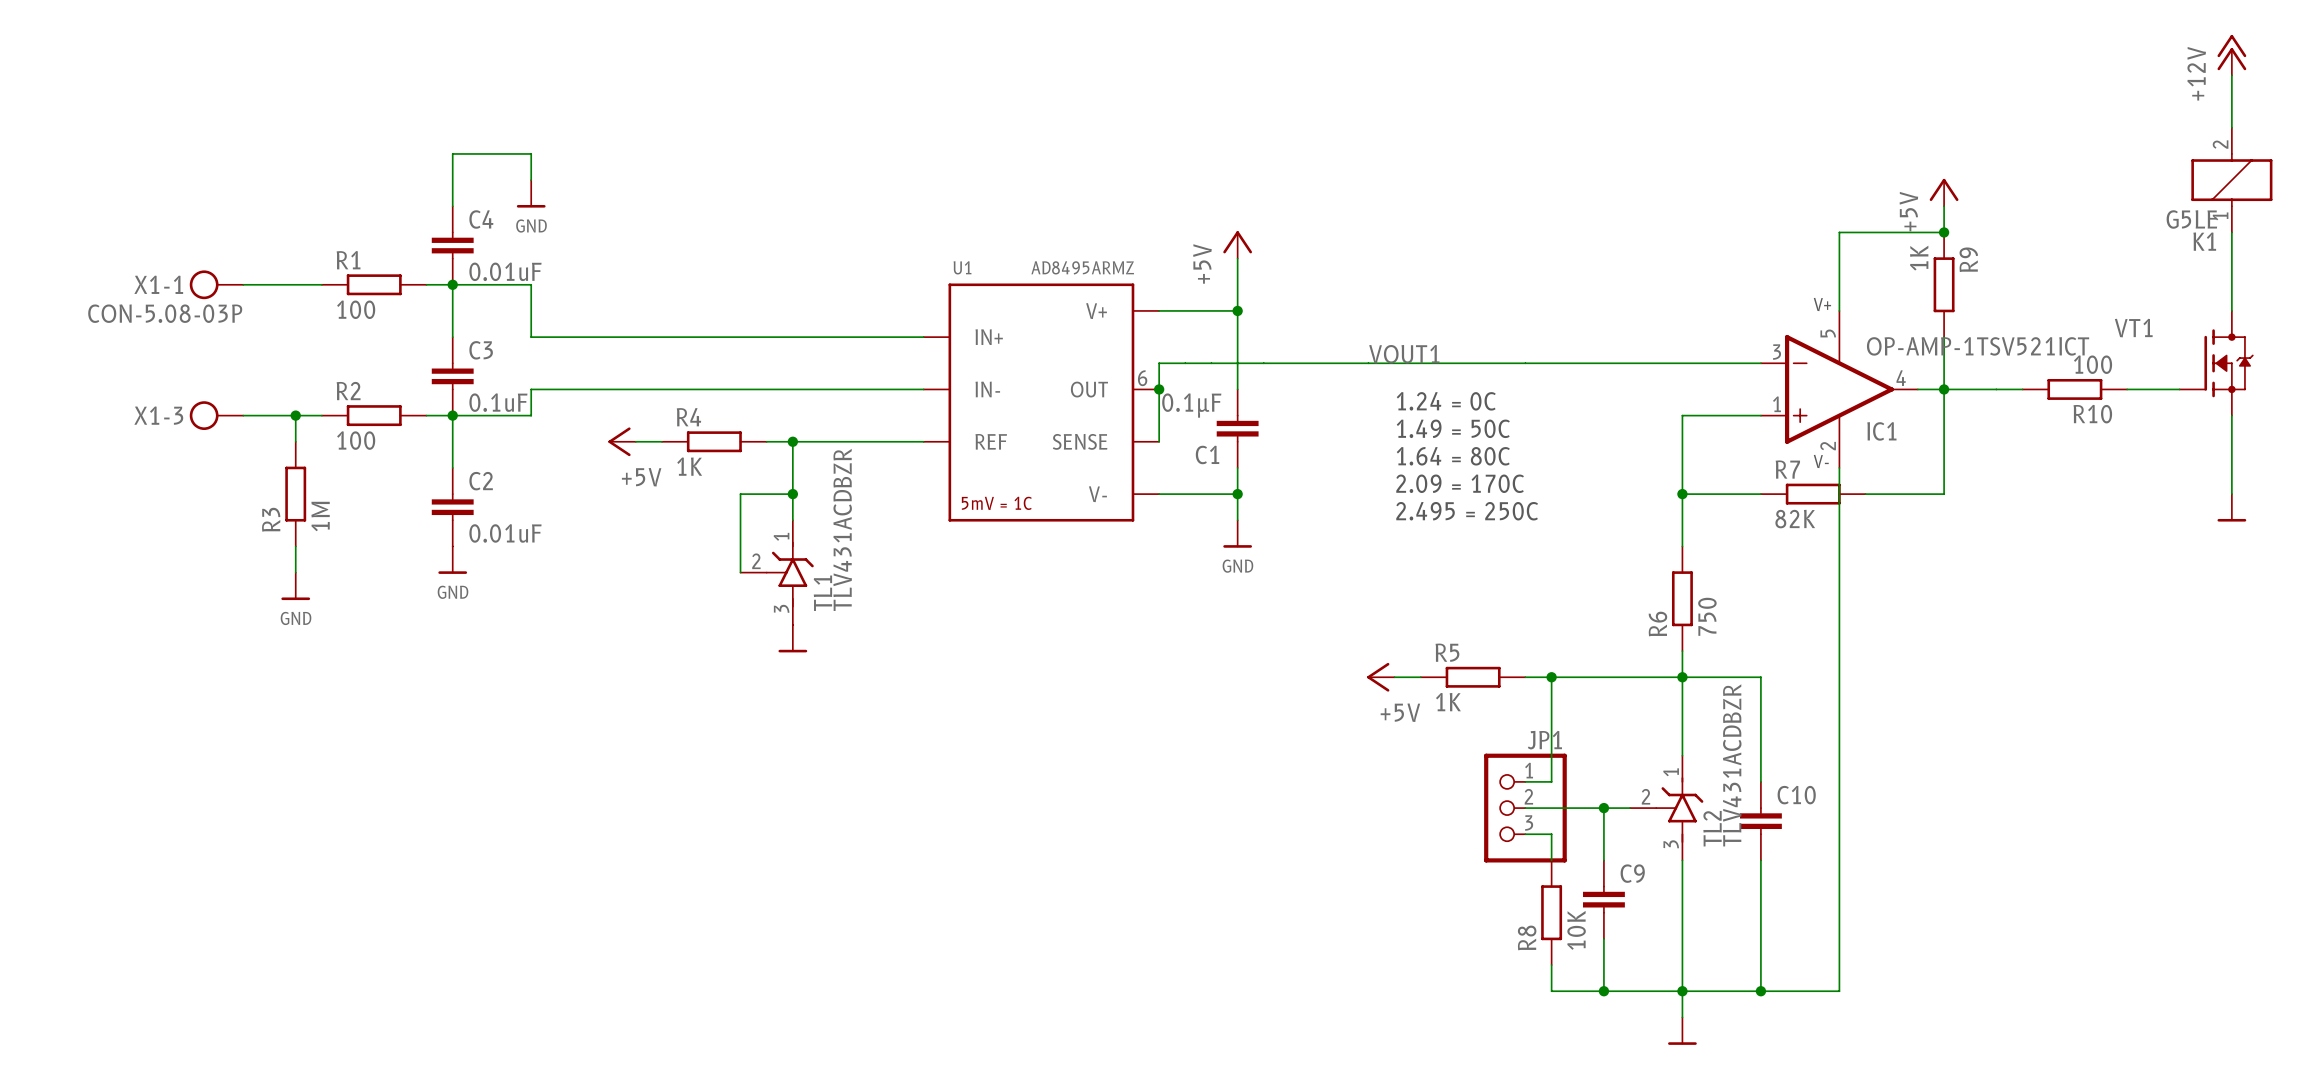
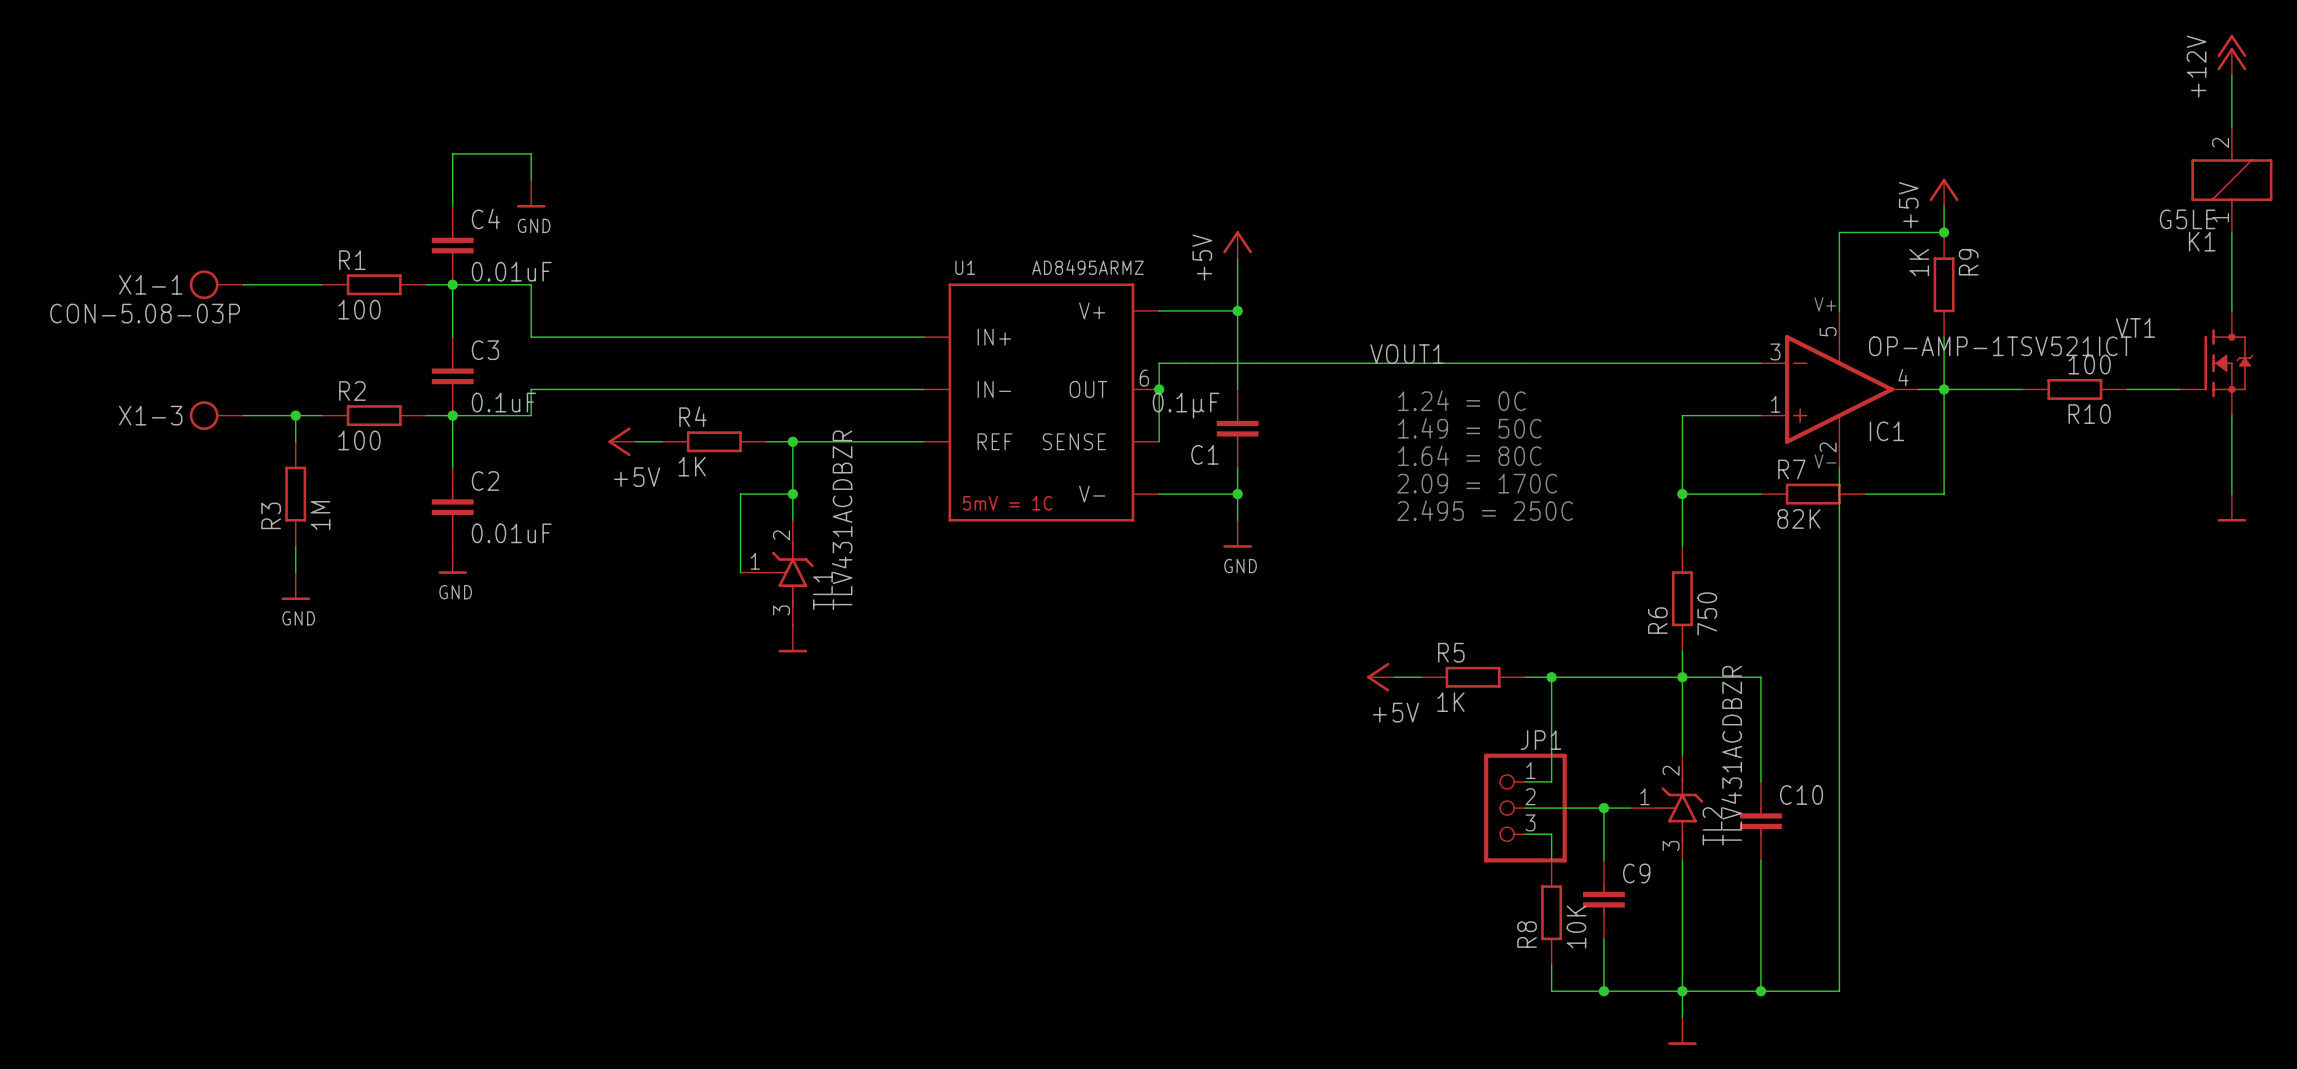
TL1 pin number: 1 (781, 536) -> 2 (781, 535)
TL1 pin number: 2 (756, 561) -> 1 (755, 561)
TL2 pin number: 1 (1671, 772) -> 2 (1671, 770)
TL2 pin number: 2 (1645, 796) -> 1 (1644, 796)

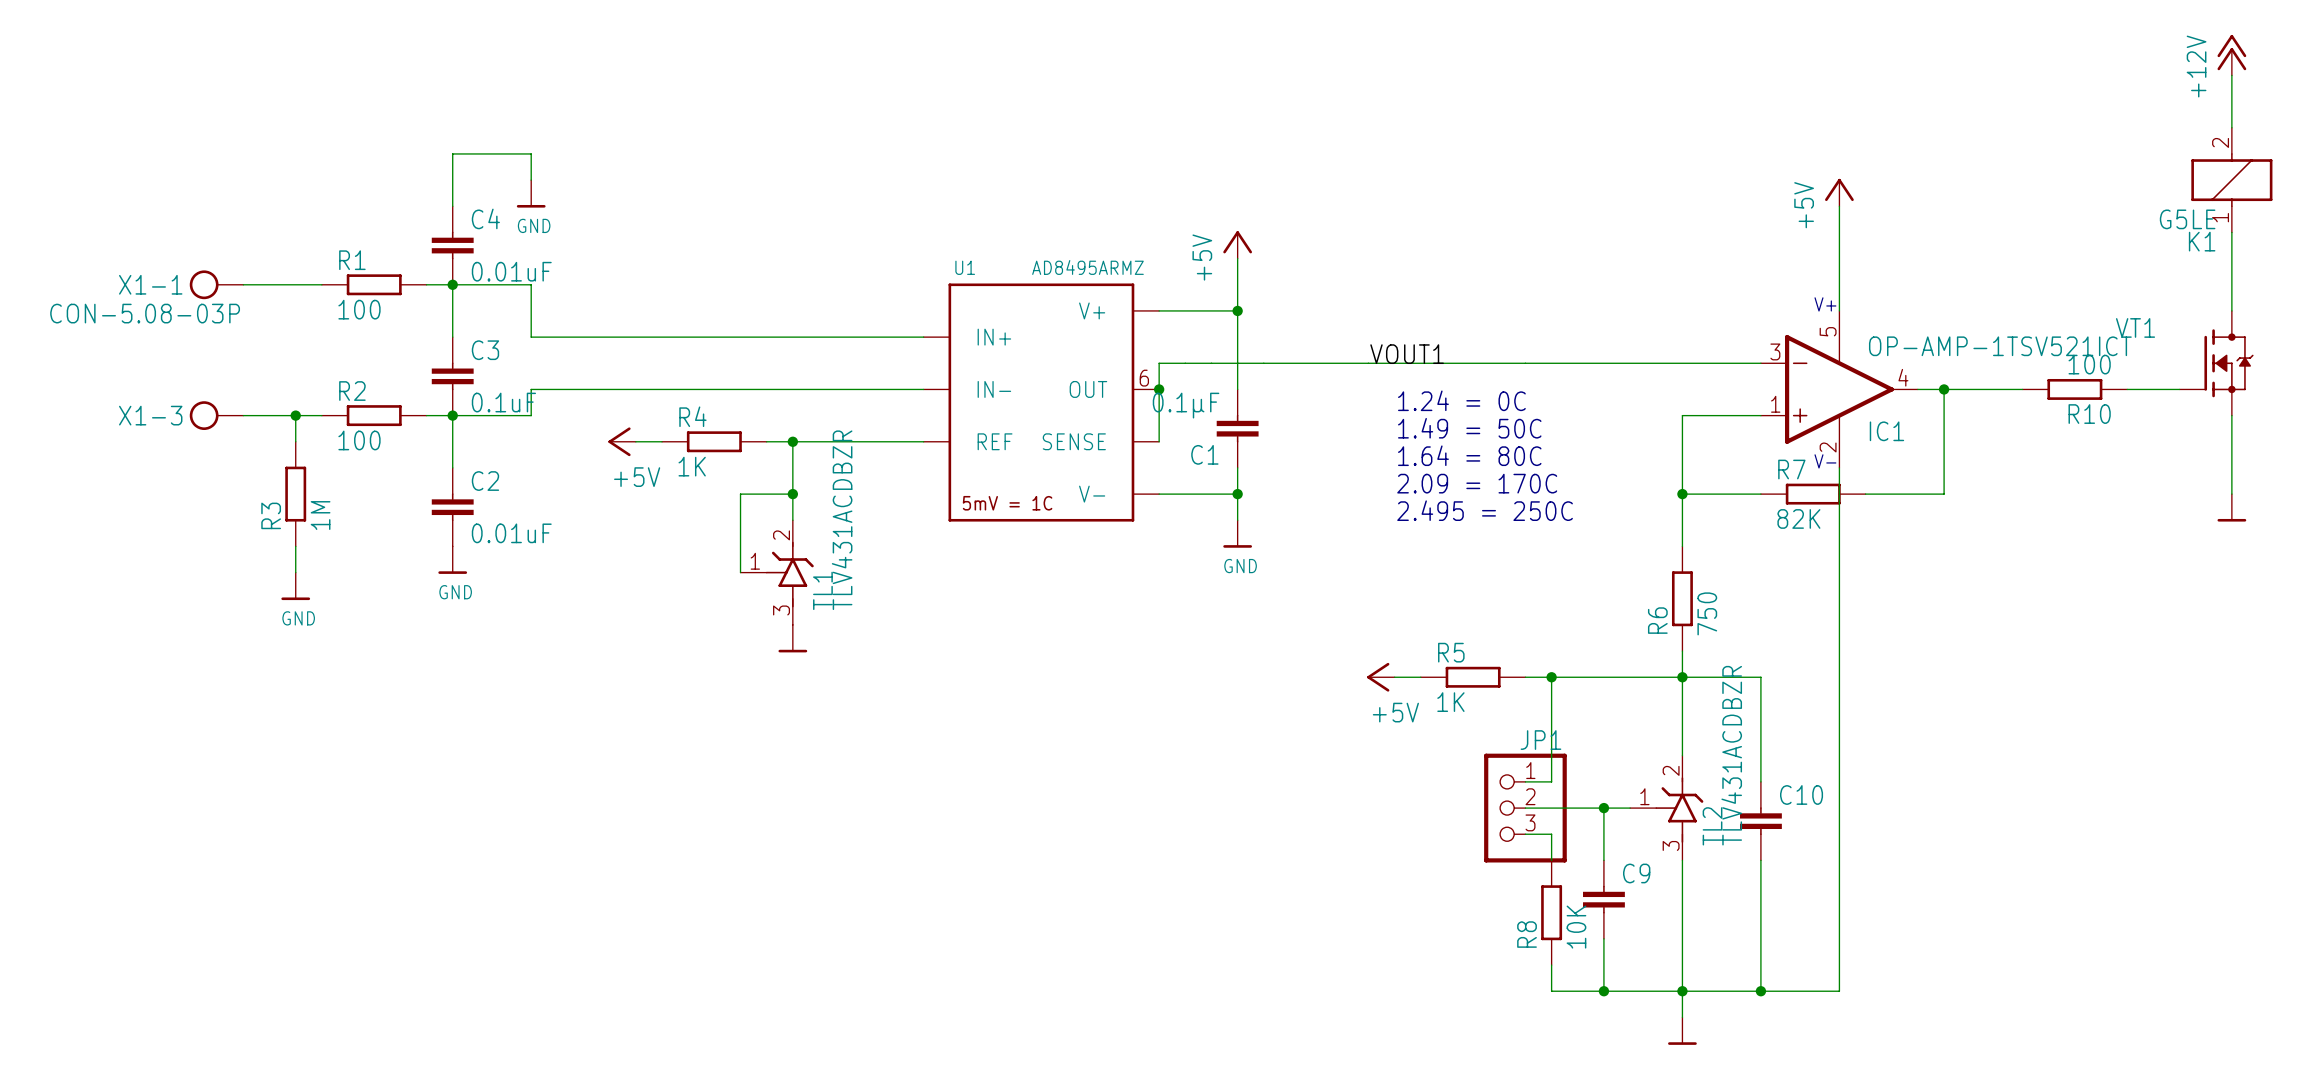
power symbol position: +5V (1944, 192) -> +5V (1839, 192)
wire: (1944, 206) (1944, 232) (1839, 232) -> (1839, 206) (1839, 232)
junction: (1944, 232) -> none
R9: 1K (1944, 284) -> none
wire: (1944, 337) (1944, 389) -> none

